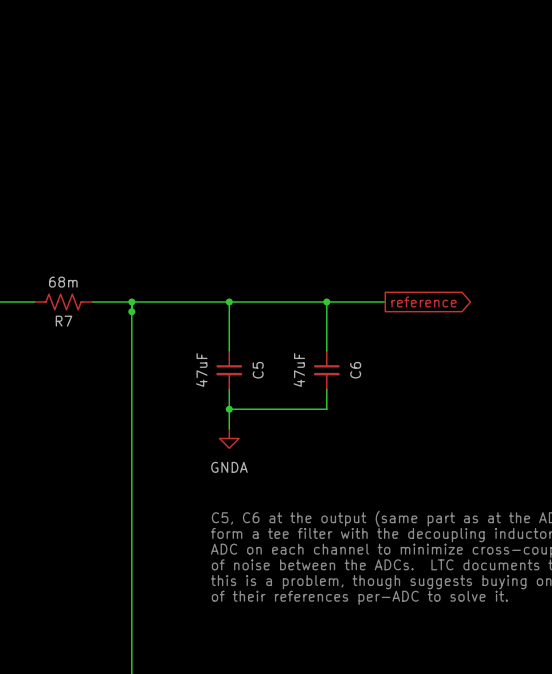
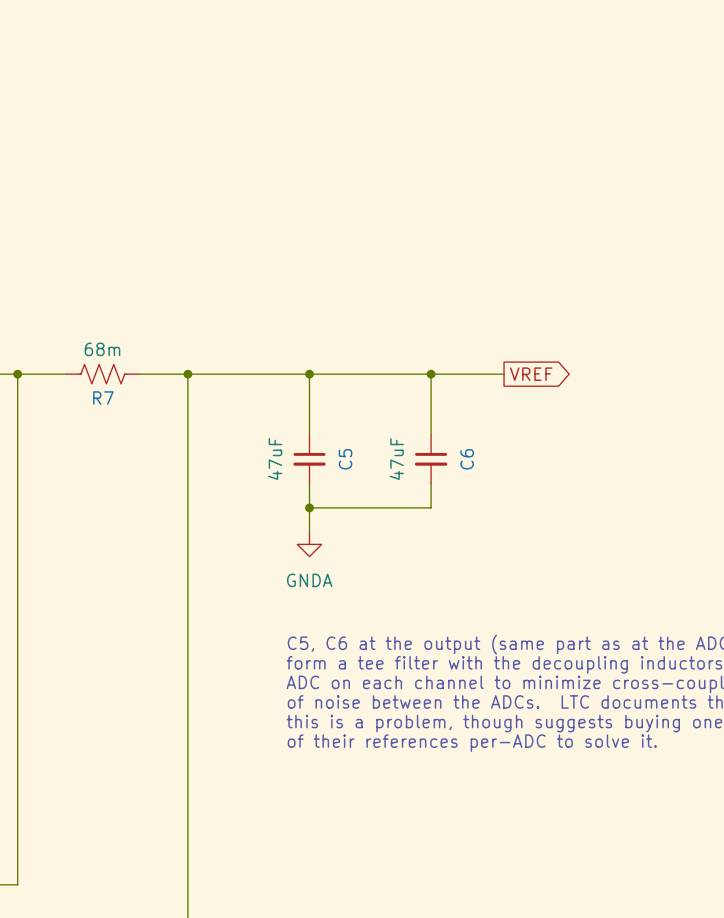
global label: reference (424, 301) -> VREF (531, 374)
junction: (131, 311) -> none

